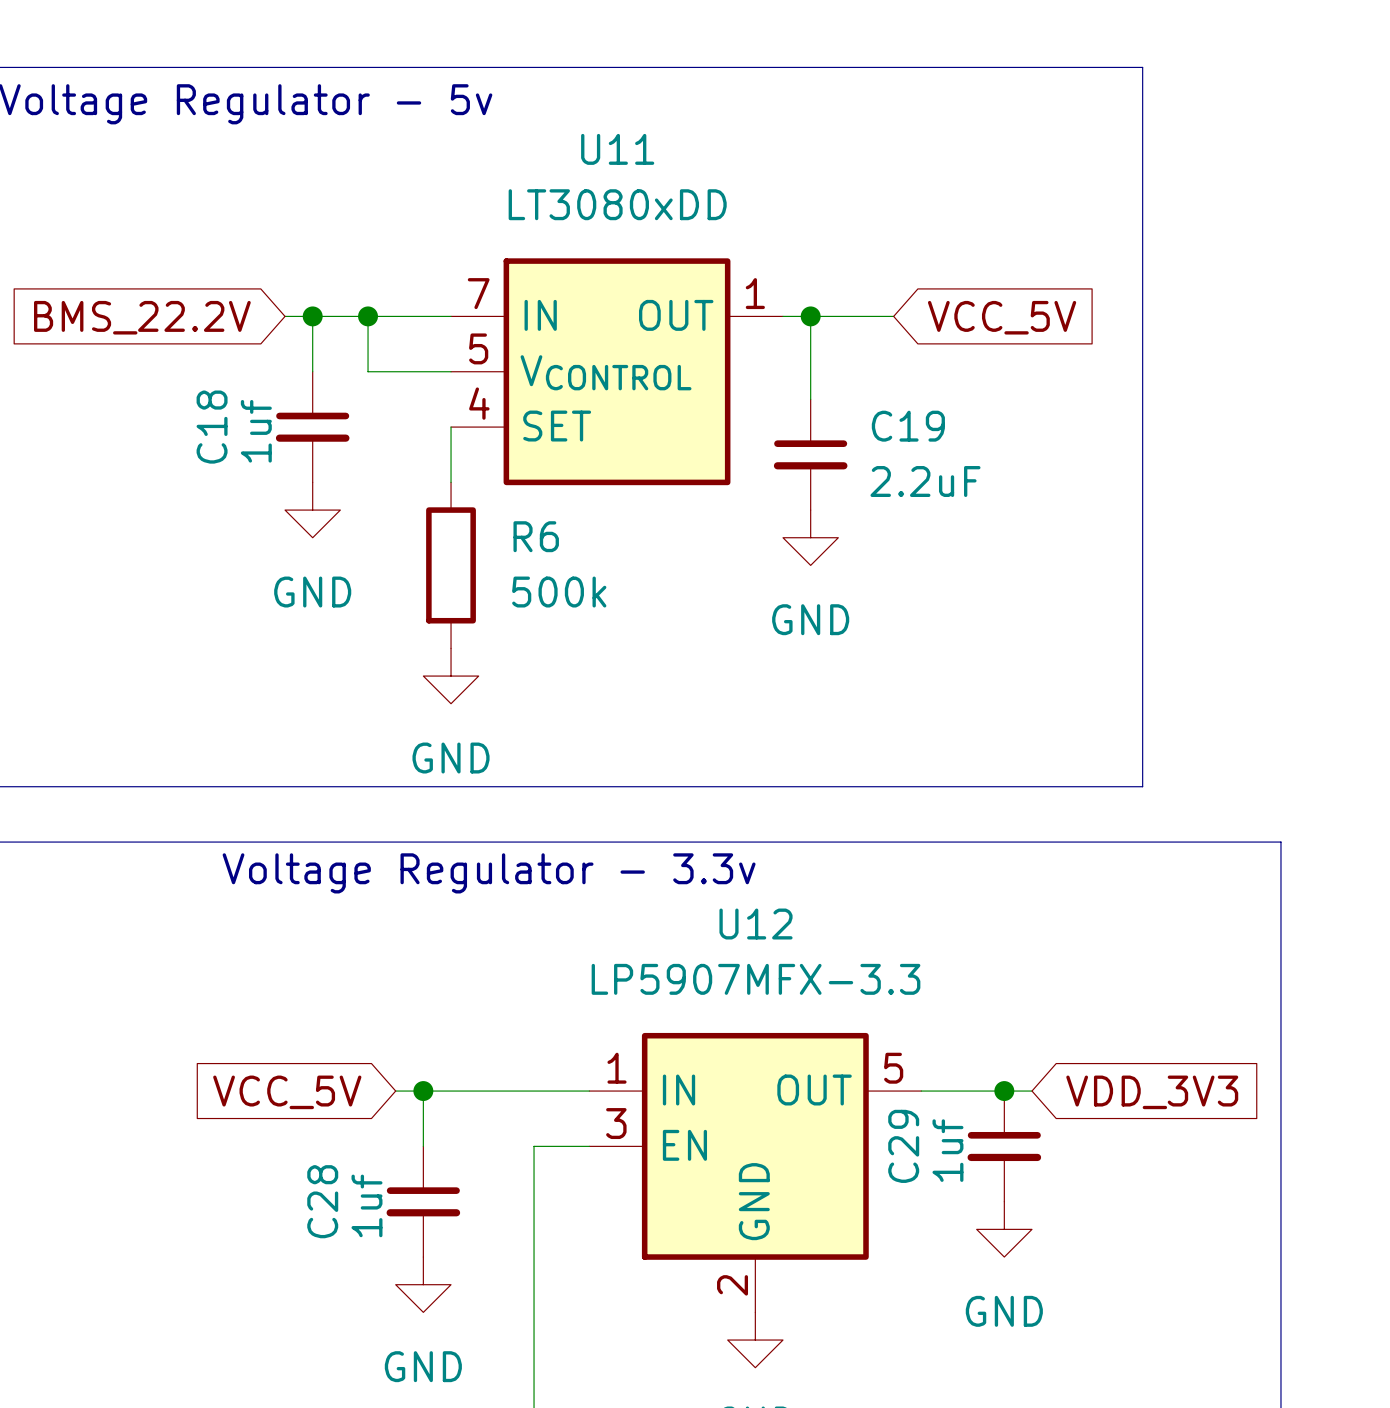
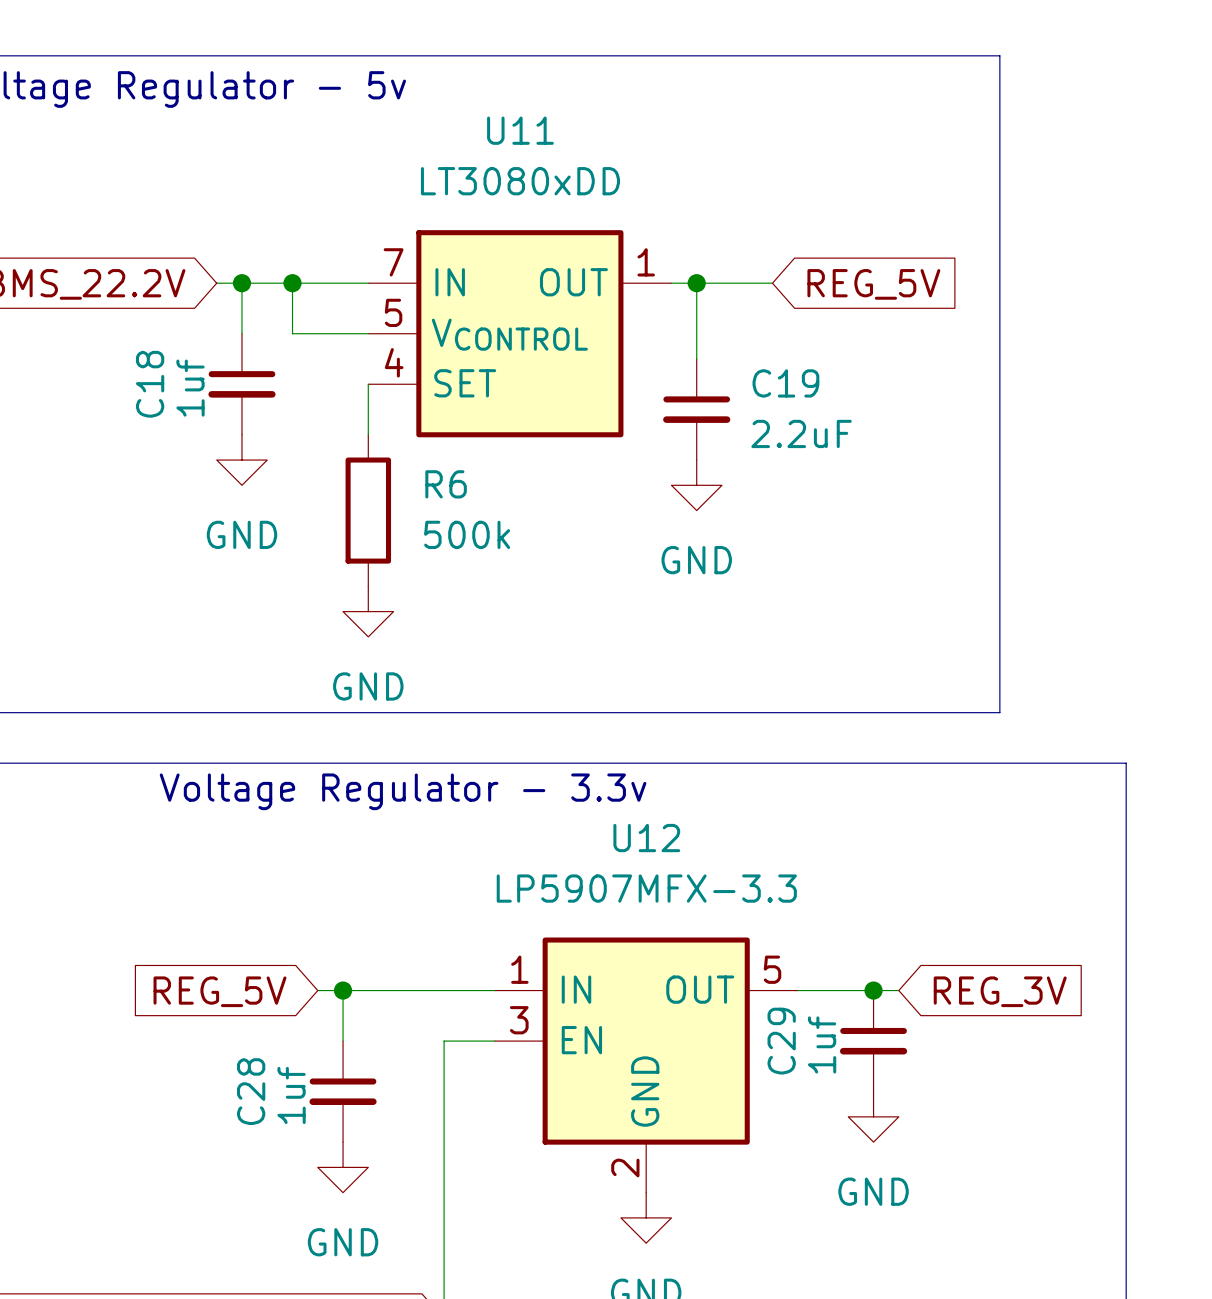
global label: VCC_5V (1002, 317) -> REG_5V (873, 284)
global label: VCC_5V (287, 1092) -> REG_5V (219, 991)
global label: VDD_3V3 (1152, 1092) -> REG_3V (1000, 991)

